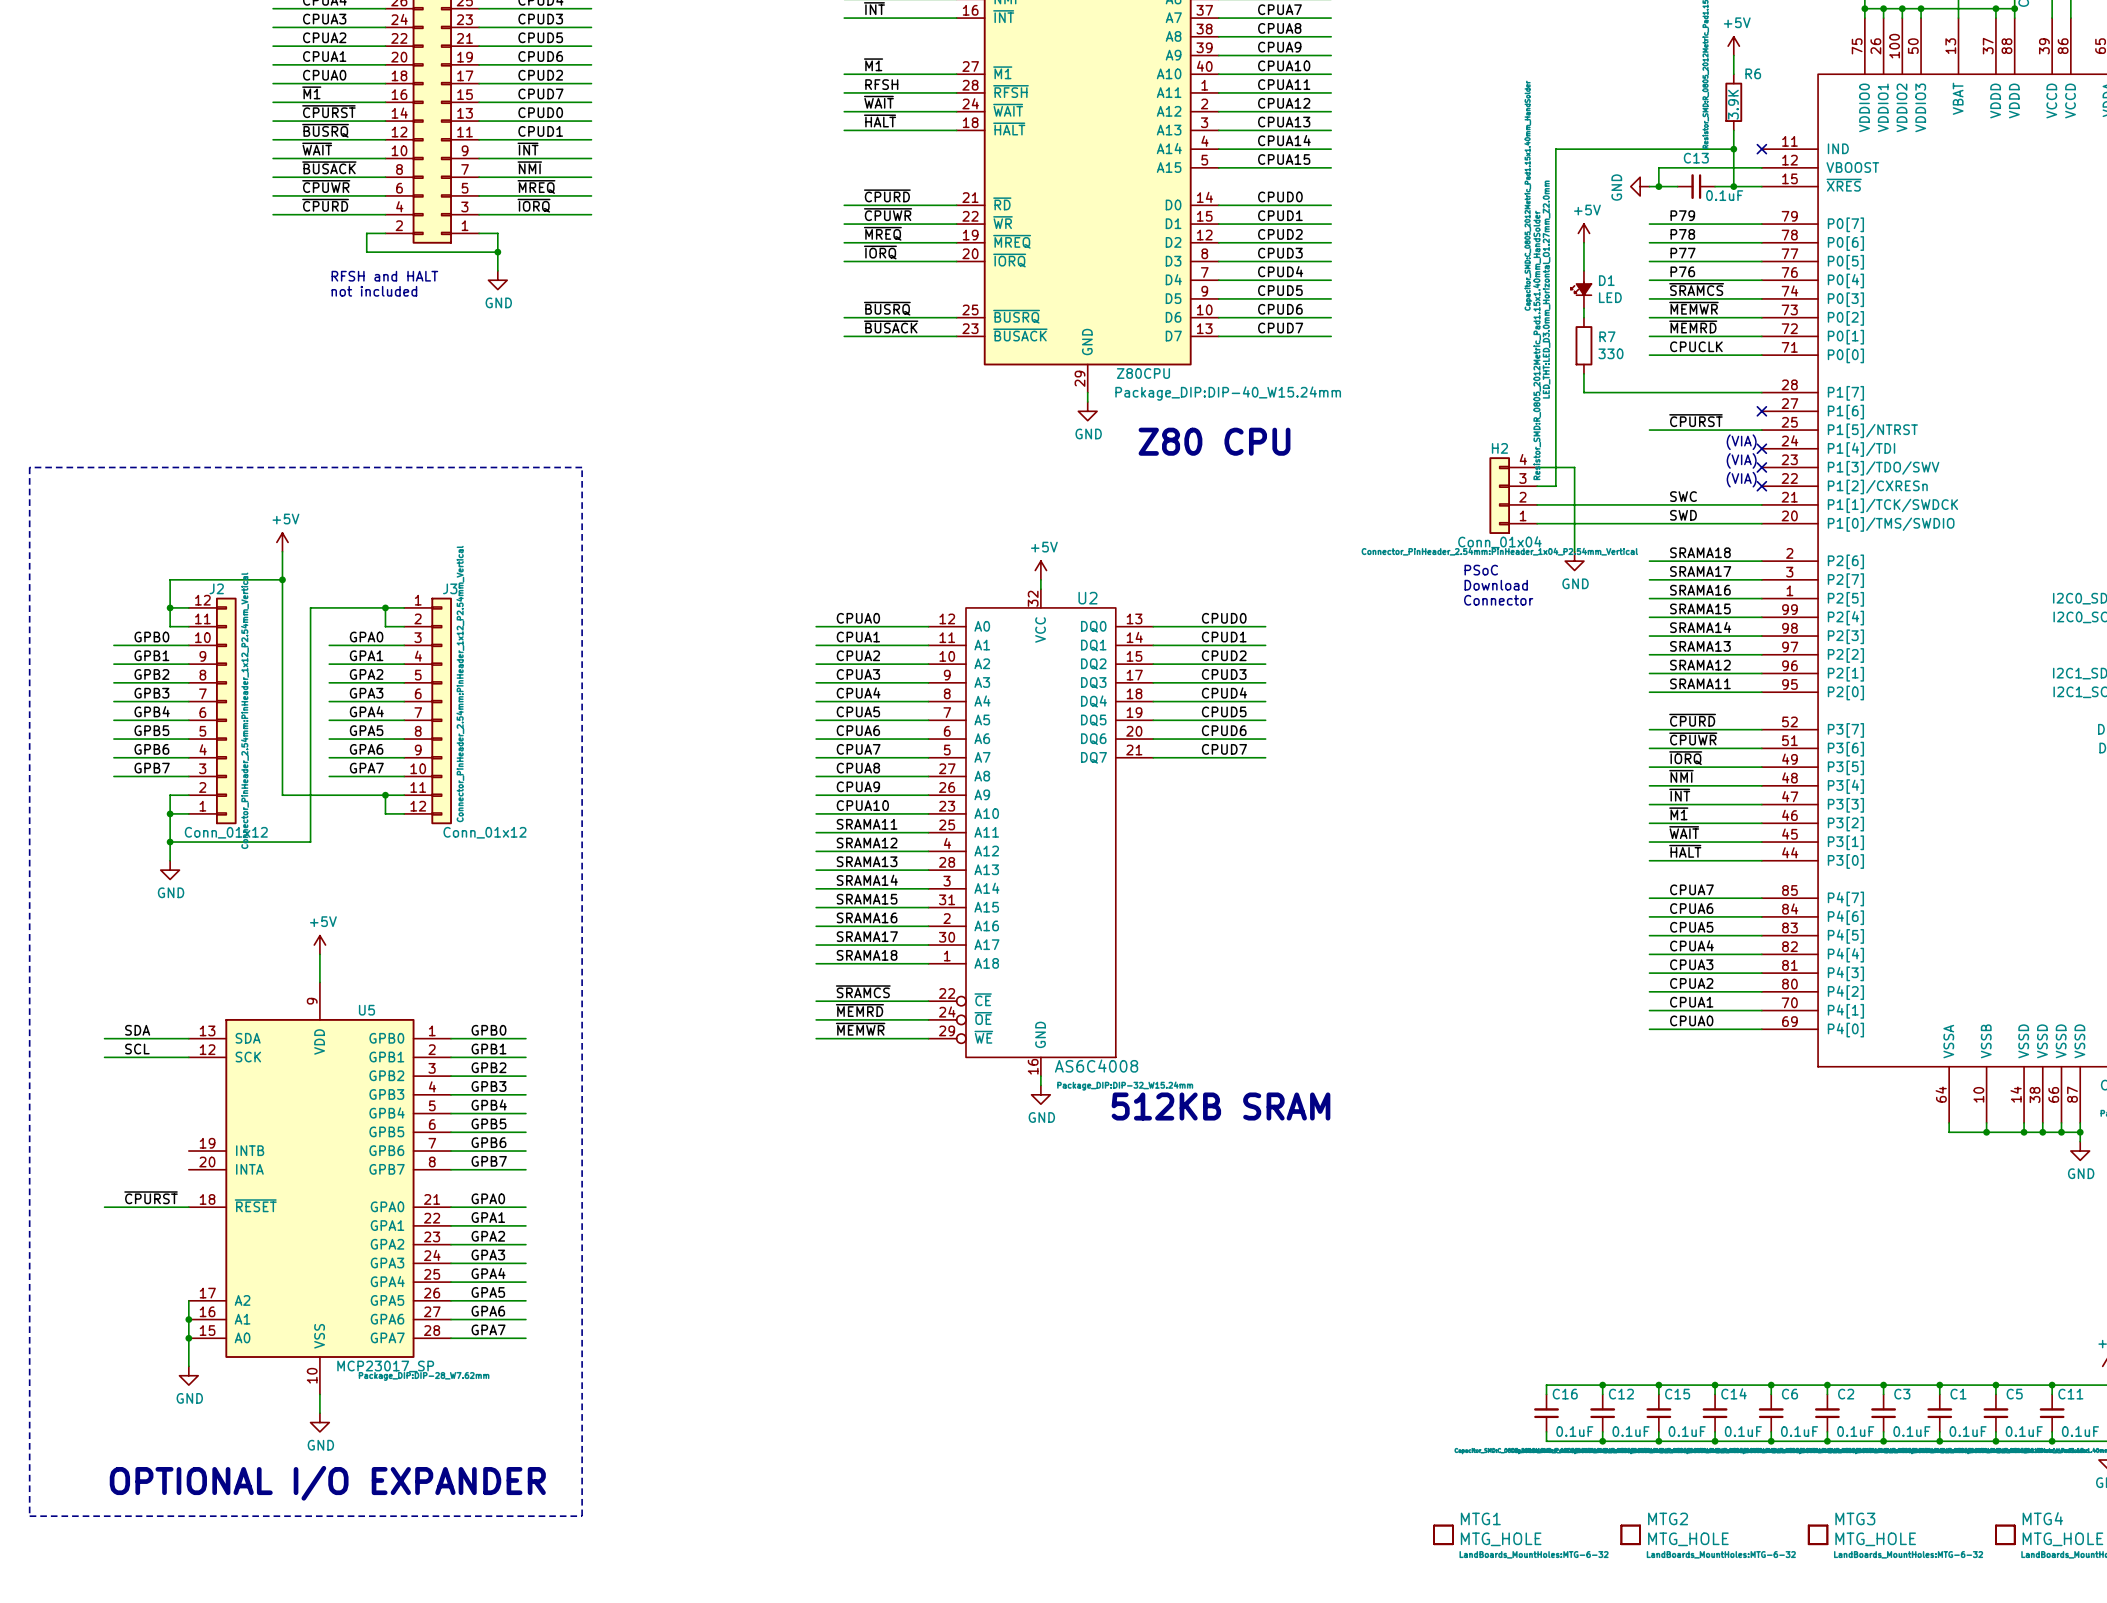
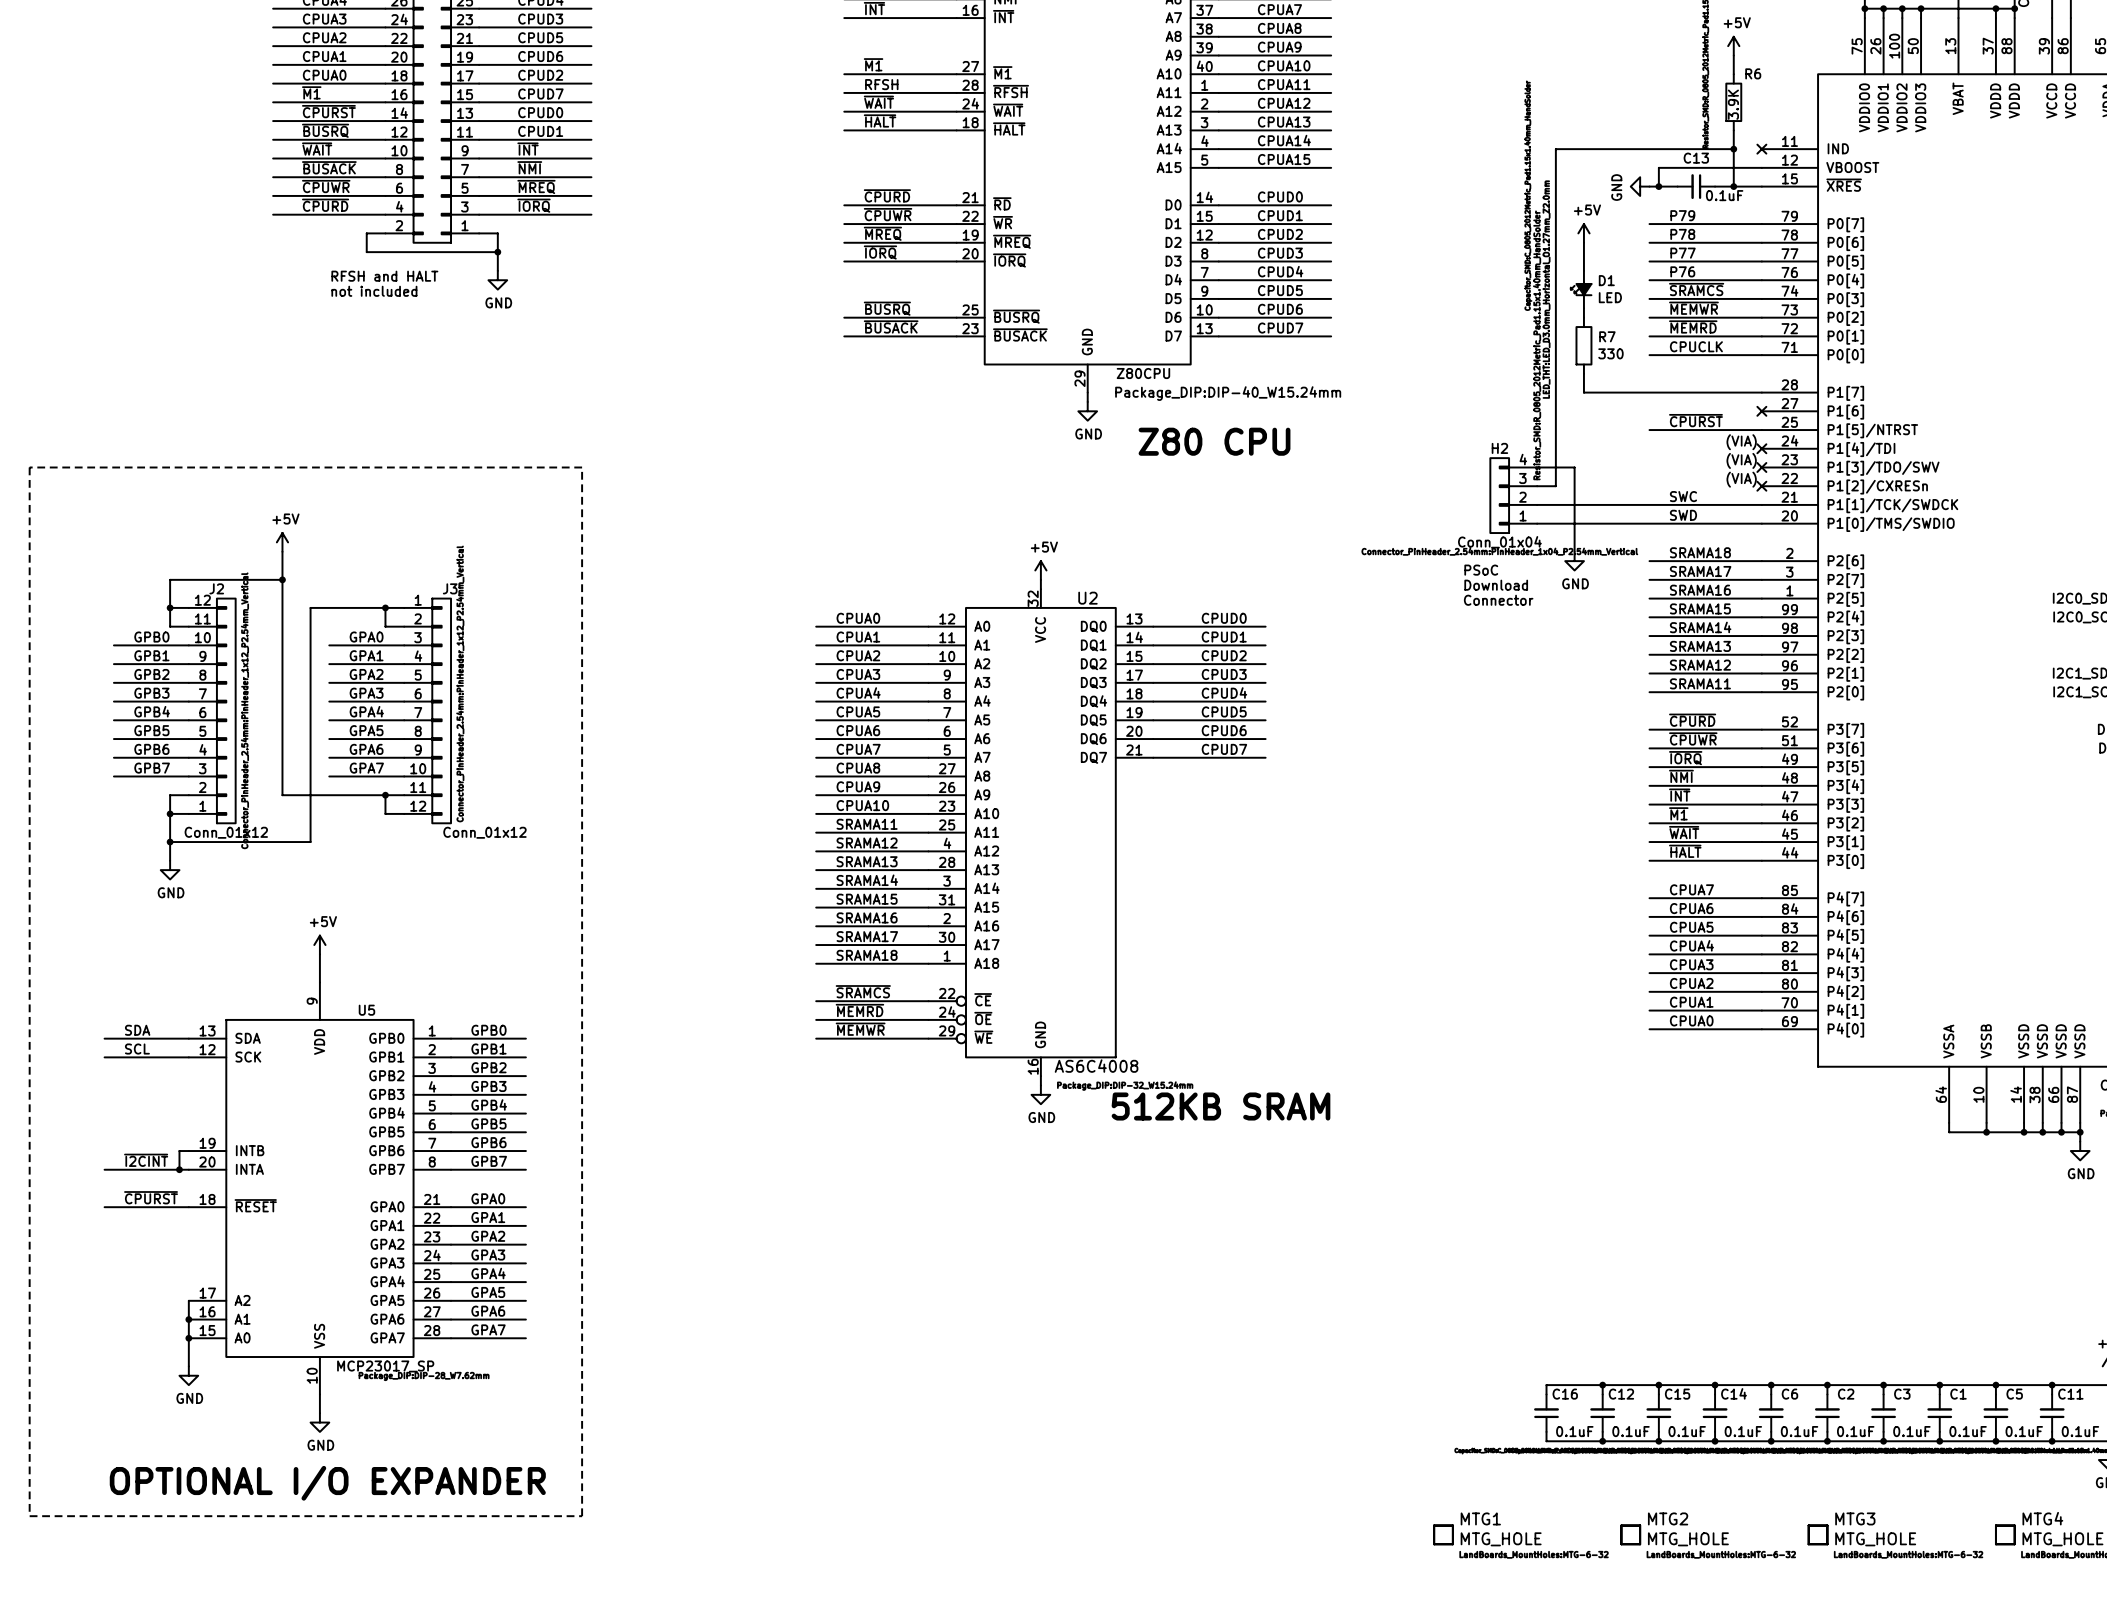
wire: none -> (188, 1151) (179, 1151) (179, 1169)
label: none -> ~{I2CINT} (146, 1160)
wire: none -> (104, 1169) (188, 1169)
junction: none -> (179, 1169)

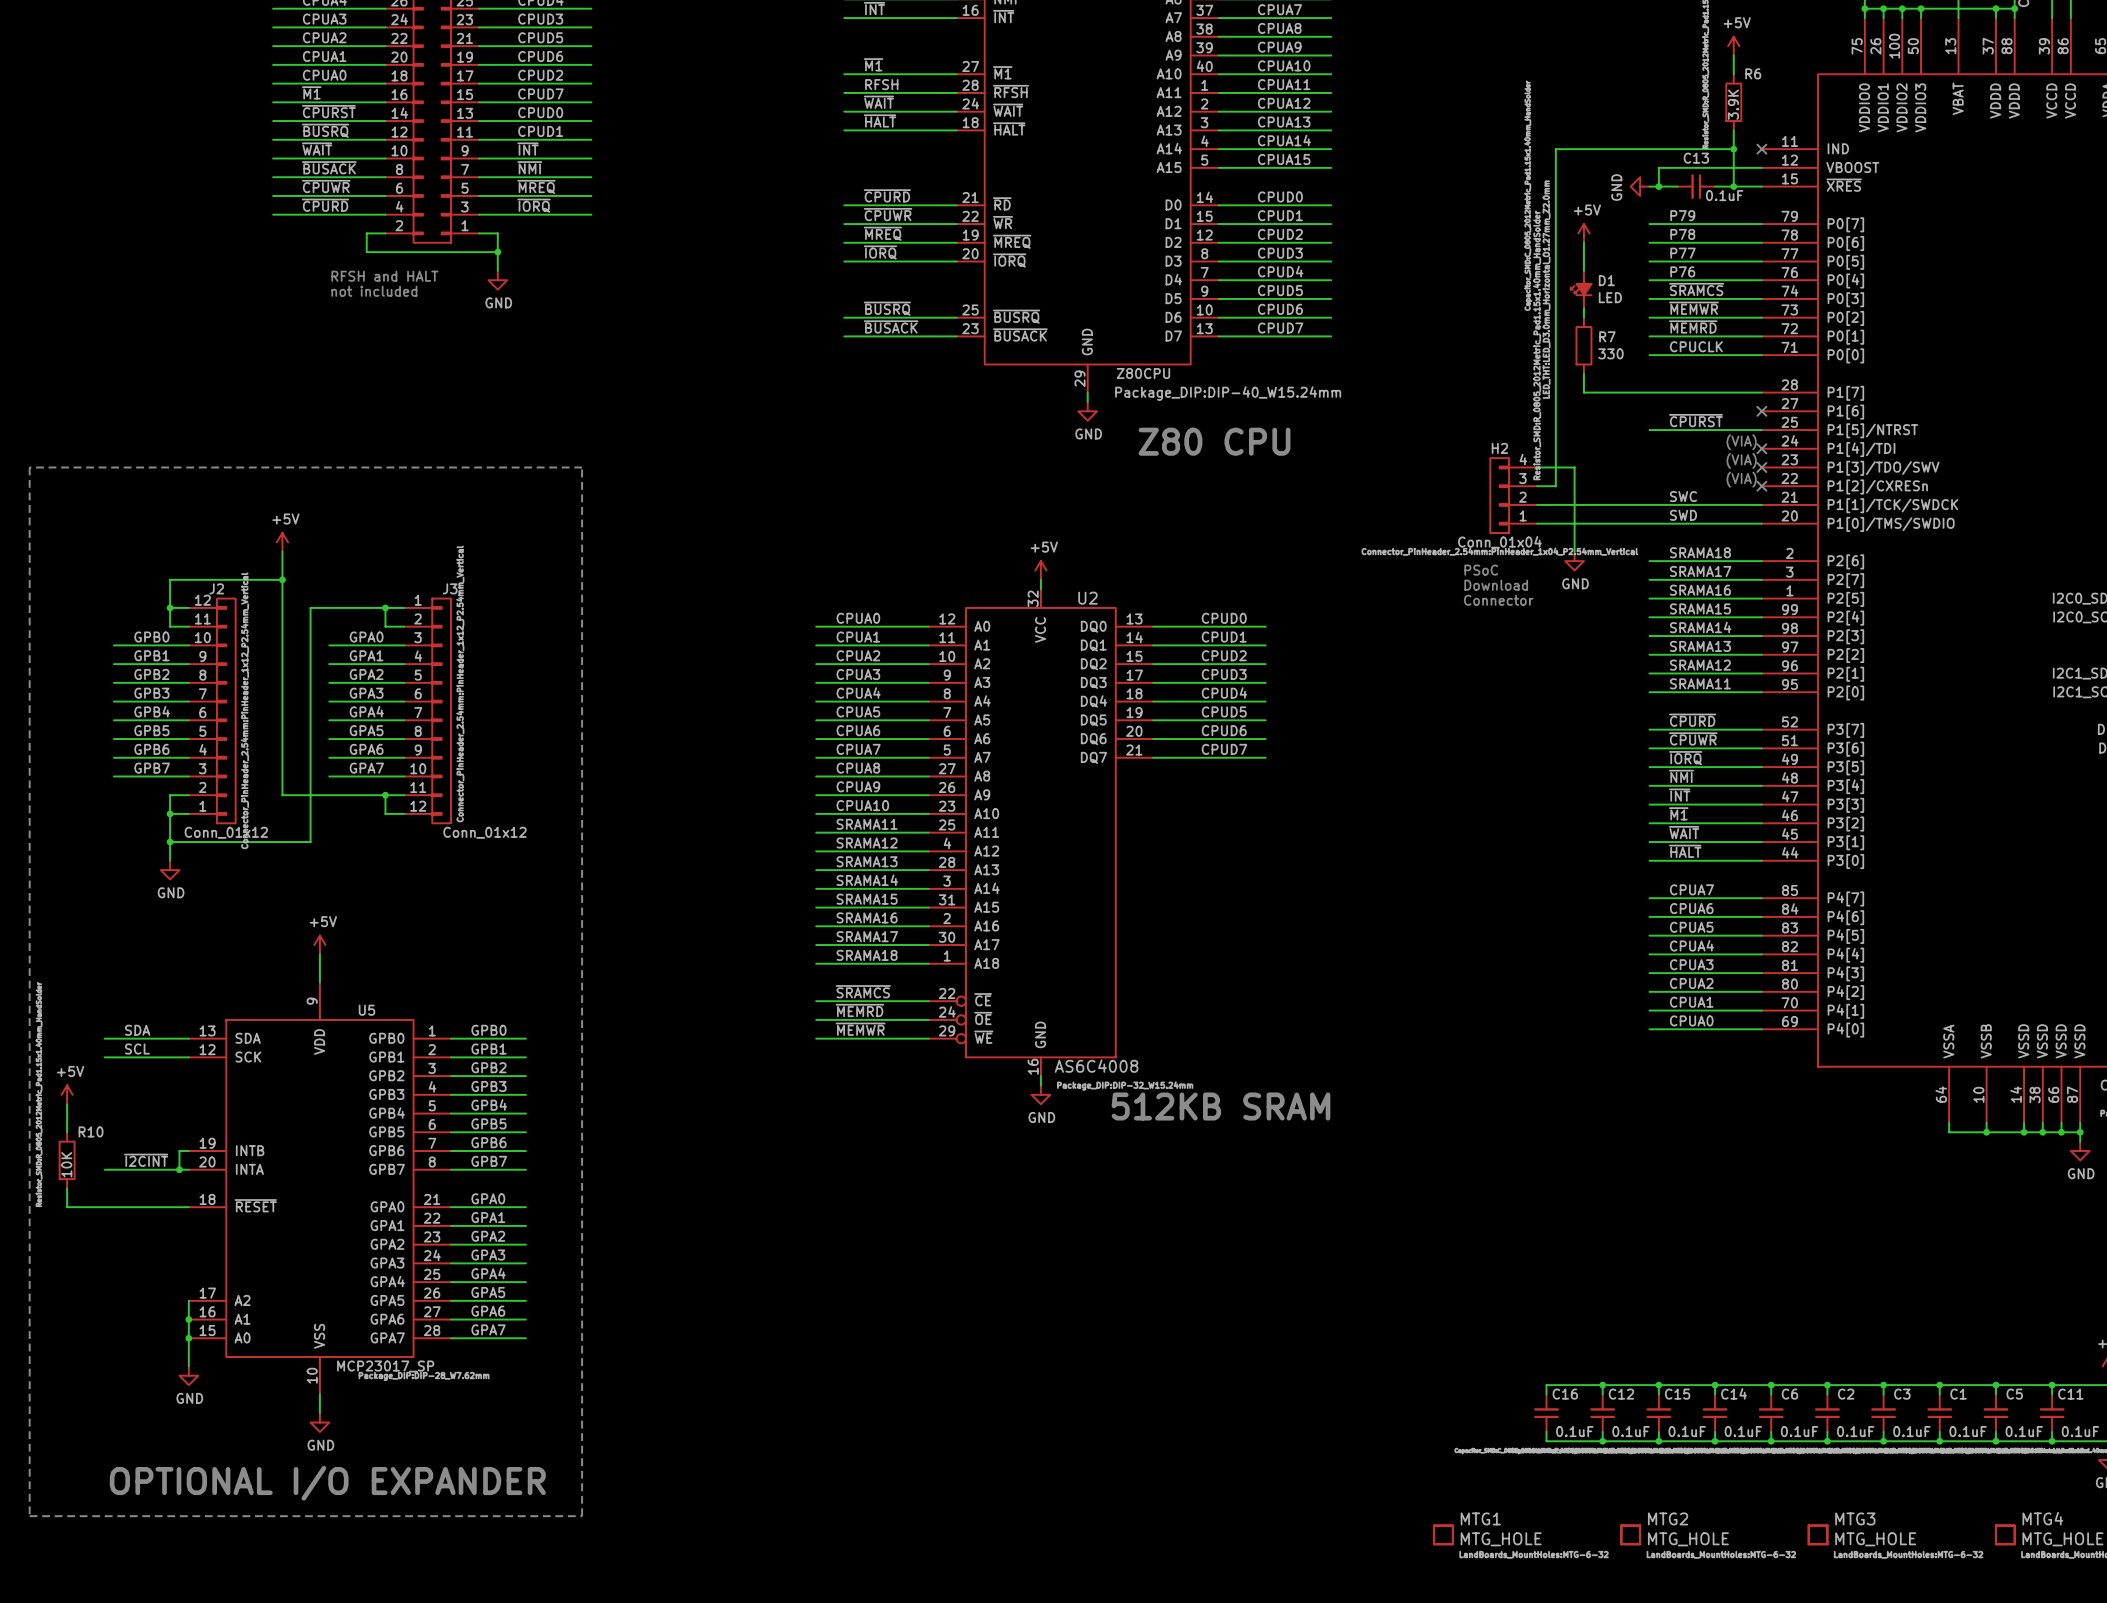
power symbol: none -> +5V (67, 1094)
wire: none -> (67, 1104) (67, 1132)
R10: none -> 10K (67, 1160)
wire: none -> (67, 1188) (67, 1207) (104, 1207)
label: ~{CPURST} (151, 1197) -> none

